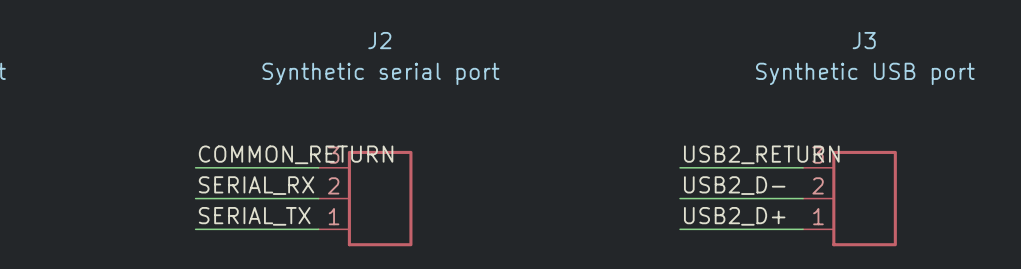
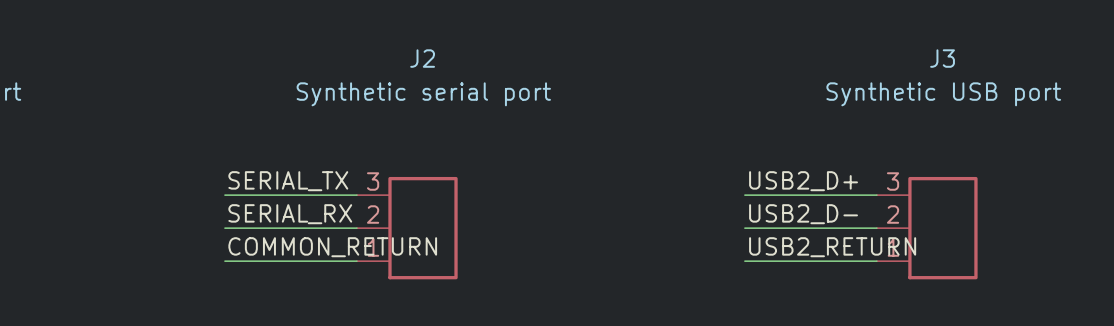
label: COMMON_RETURN (296, 154) -> SERIAL_TX (288, 181)
label: USB2_RETURN (761, 154) -> USB2_D+ (803, 181)
label: SERIAL_TX (254, 216) -> COMMON_RETURN (332, 247)
label: USB2_D+ (734, 216) -> USB2_RETURN (832, 247)

